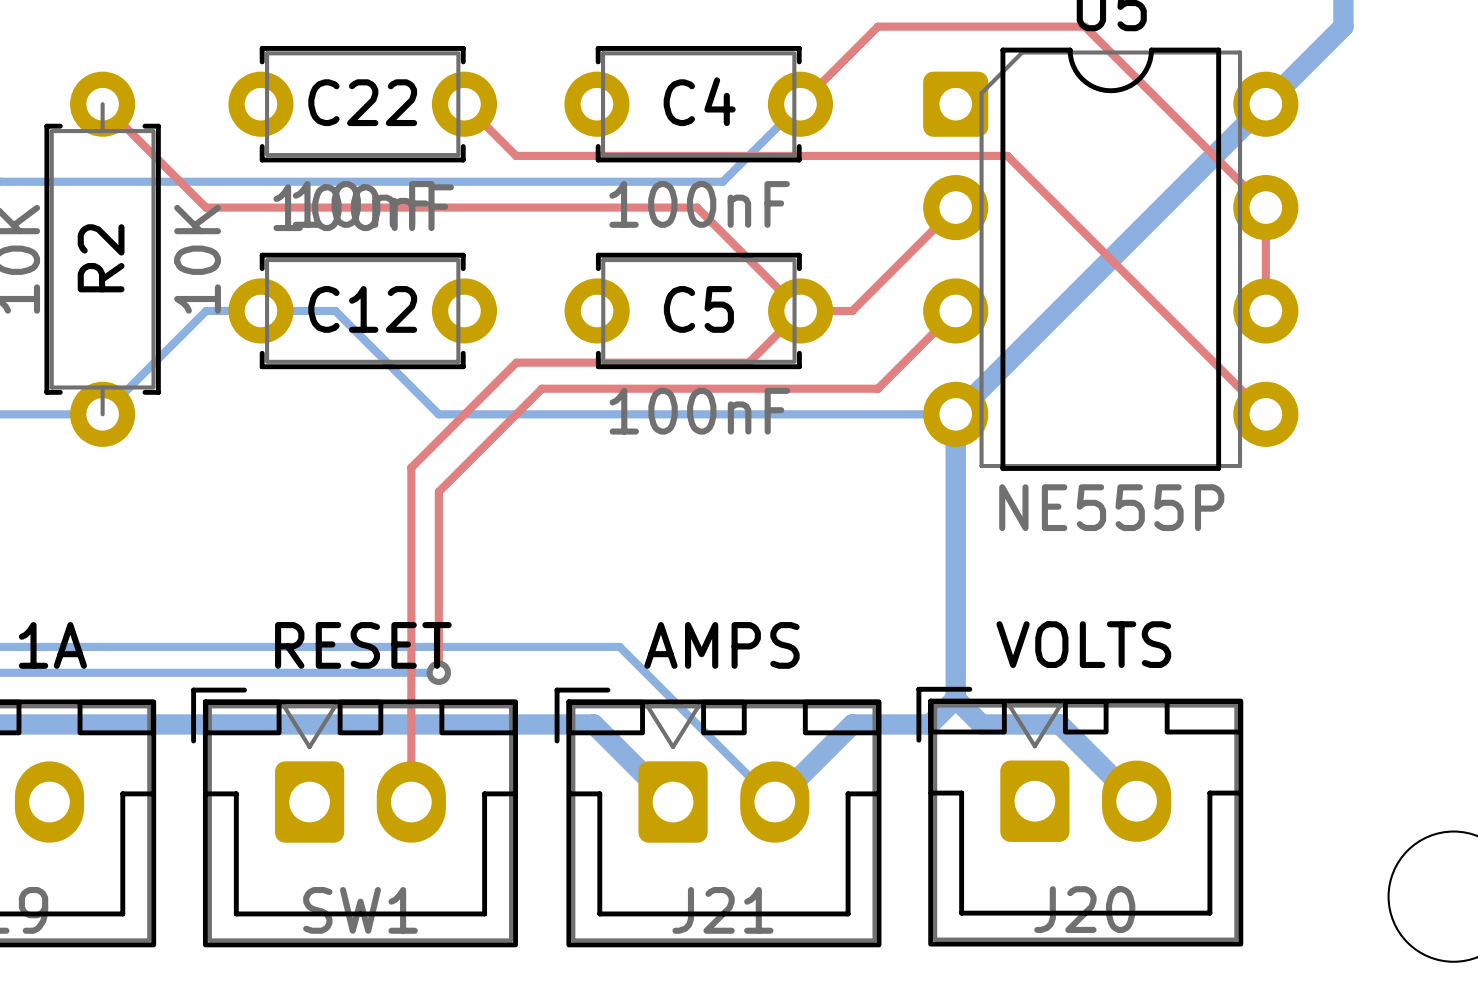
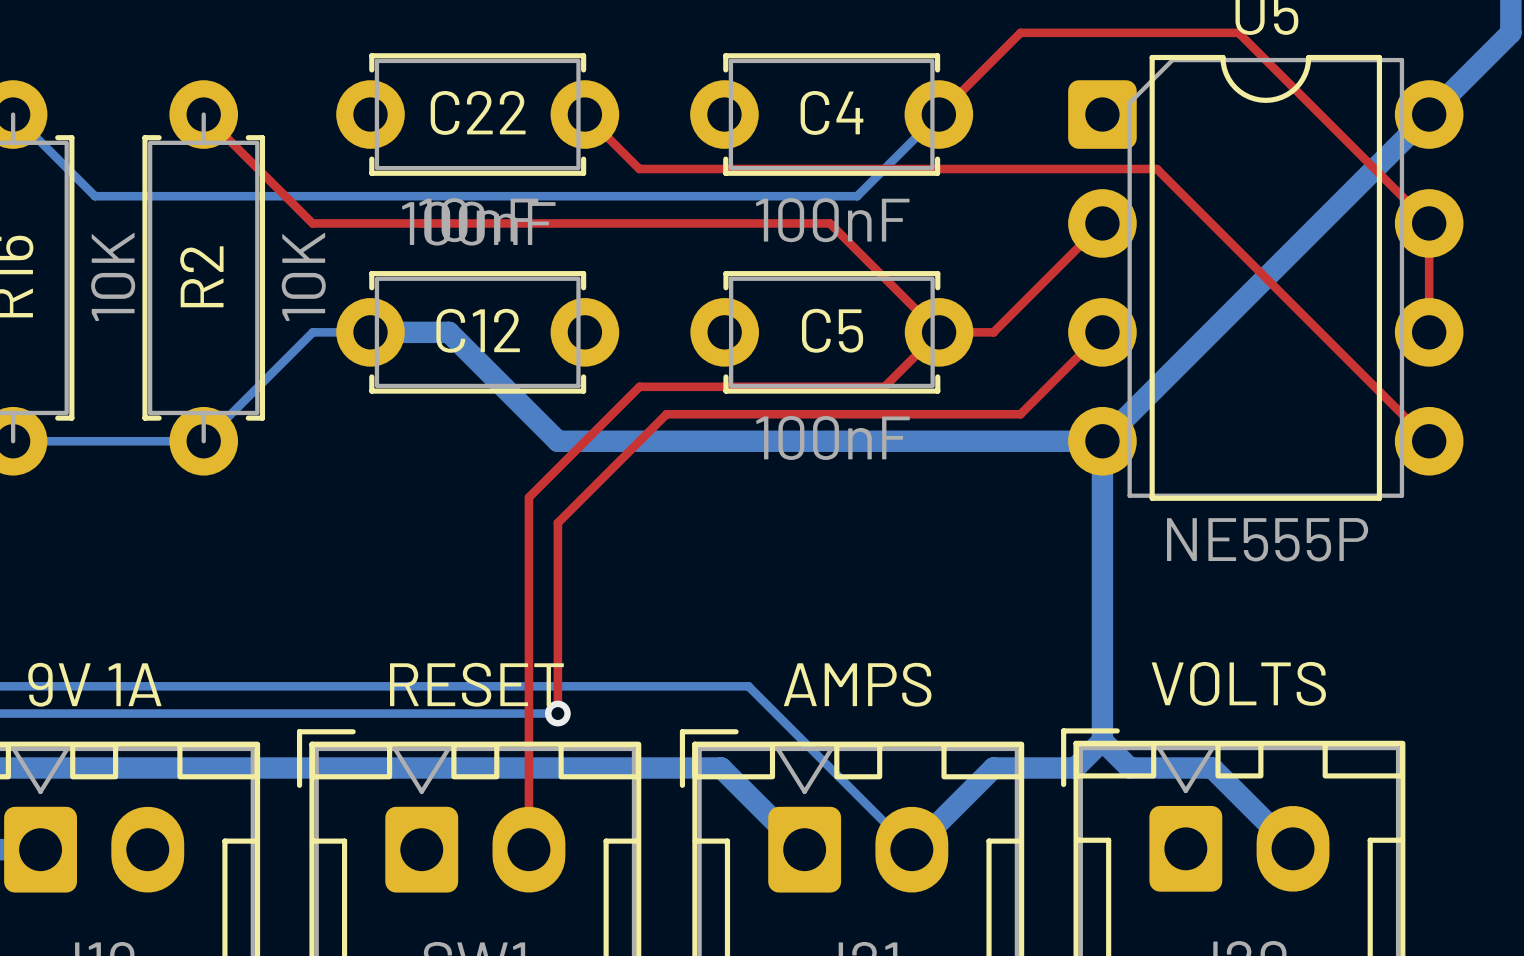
bottom track width: thin (260, 310) (335, 310) (438, 414) (955, 414) -> thick (370, 332) (448, 332) (557, 441) (1102, 441)

